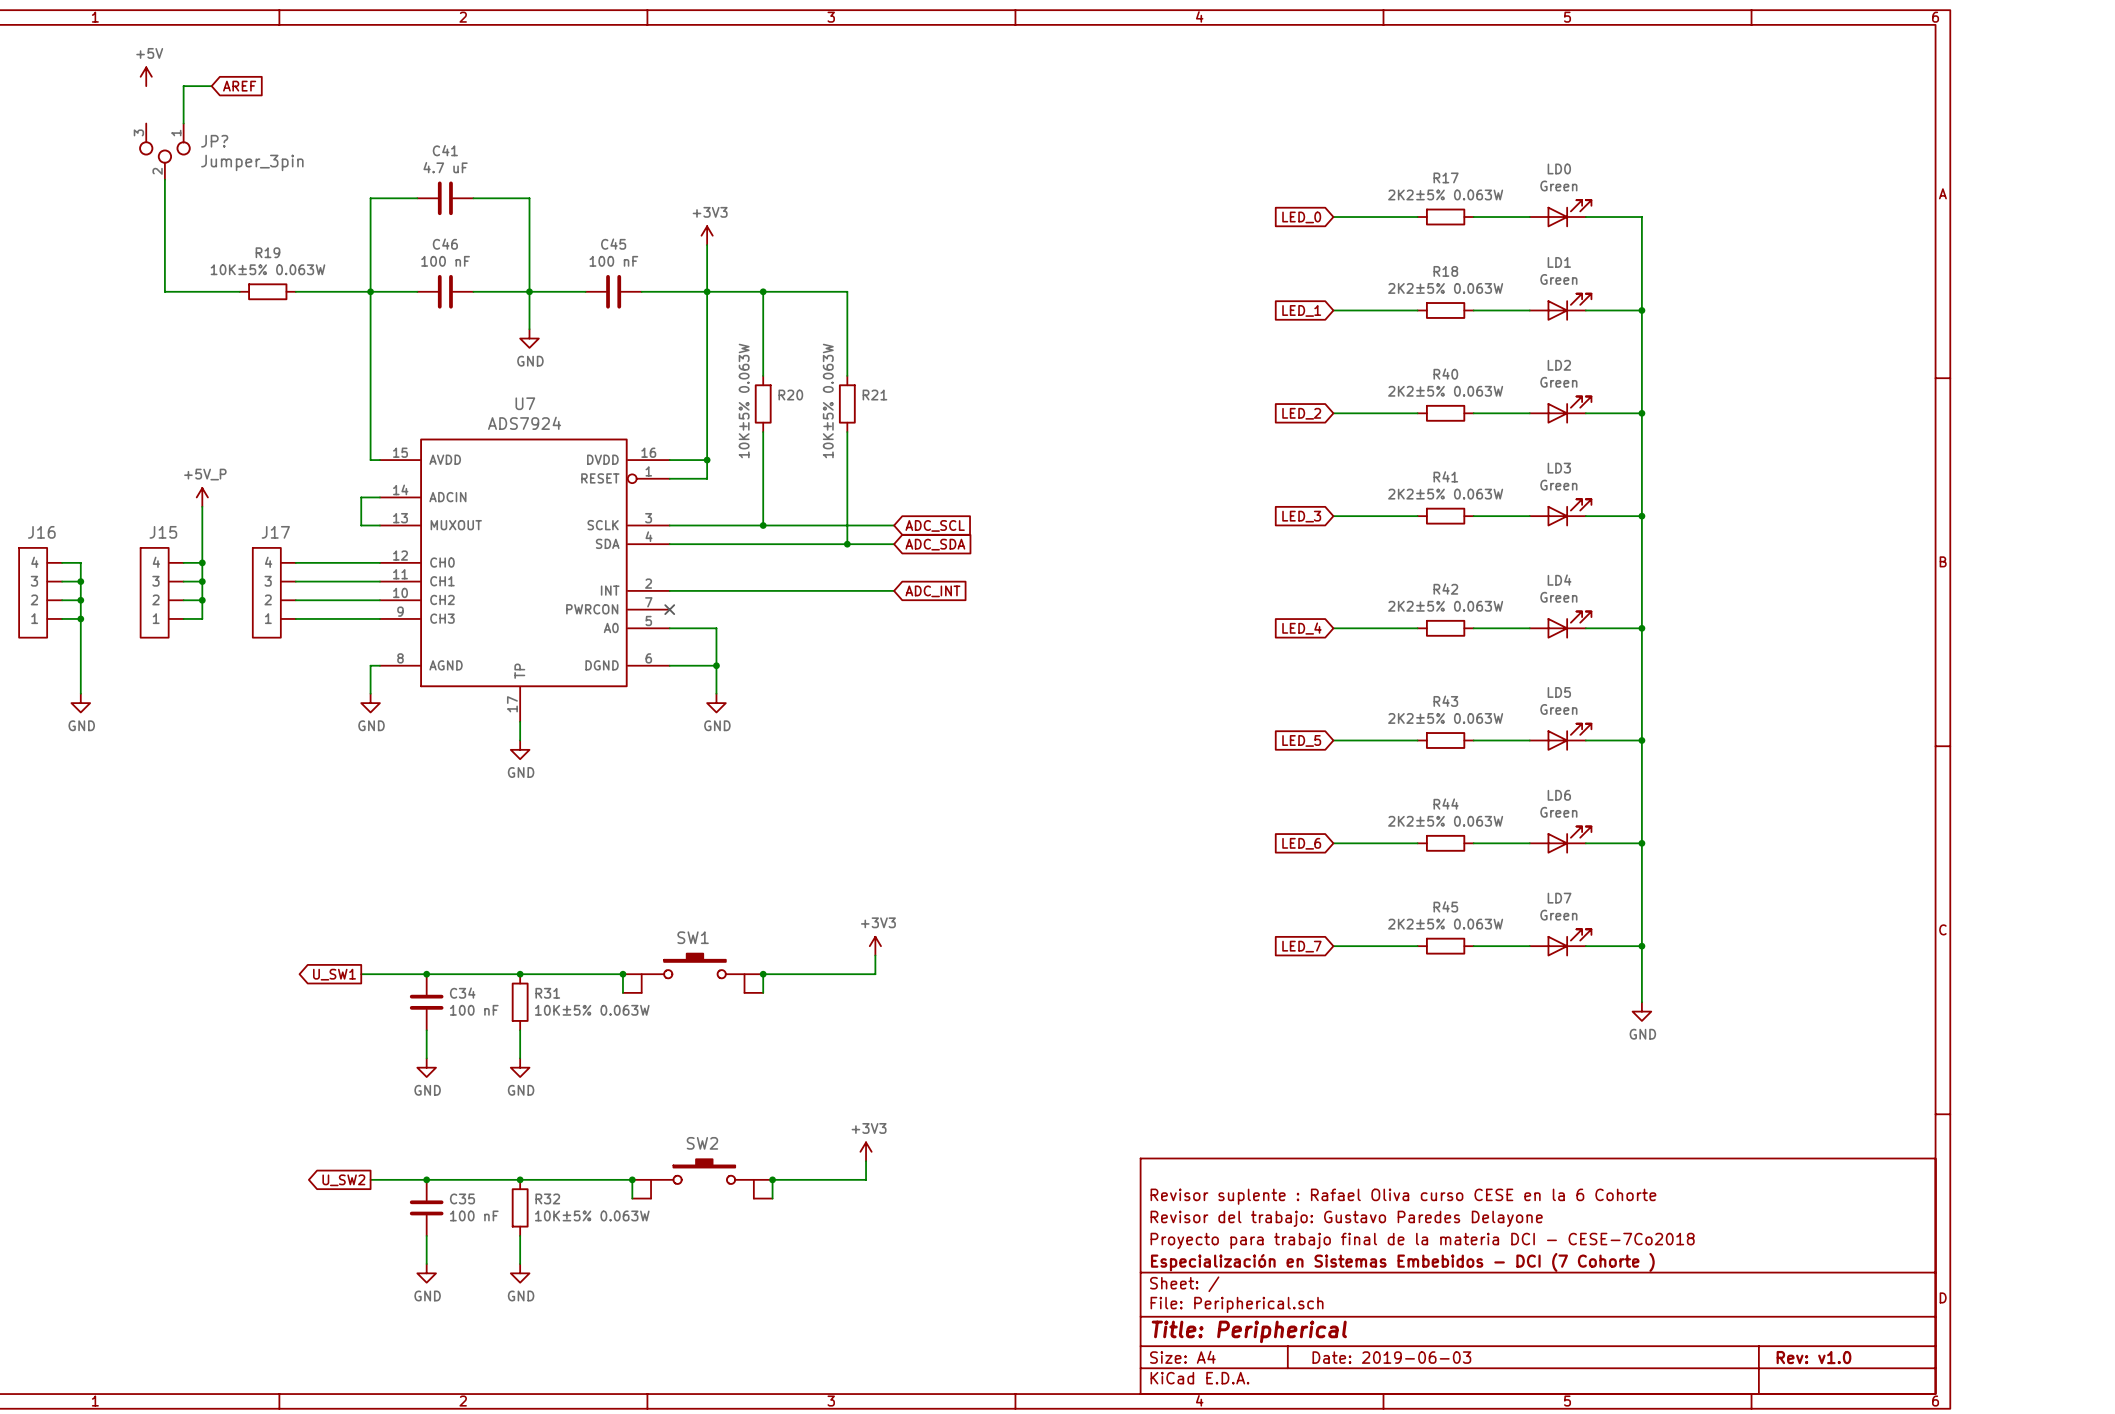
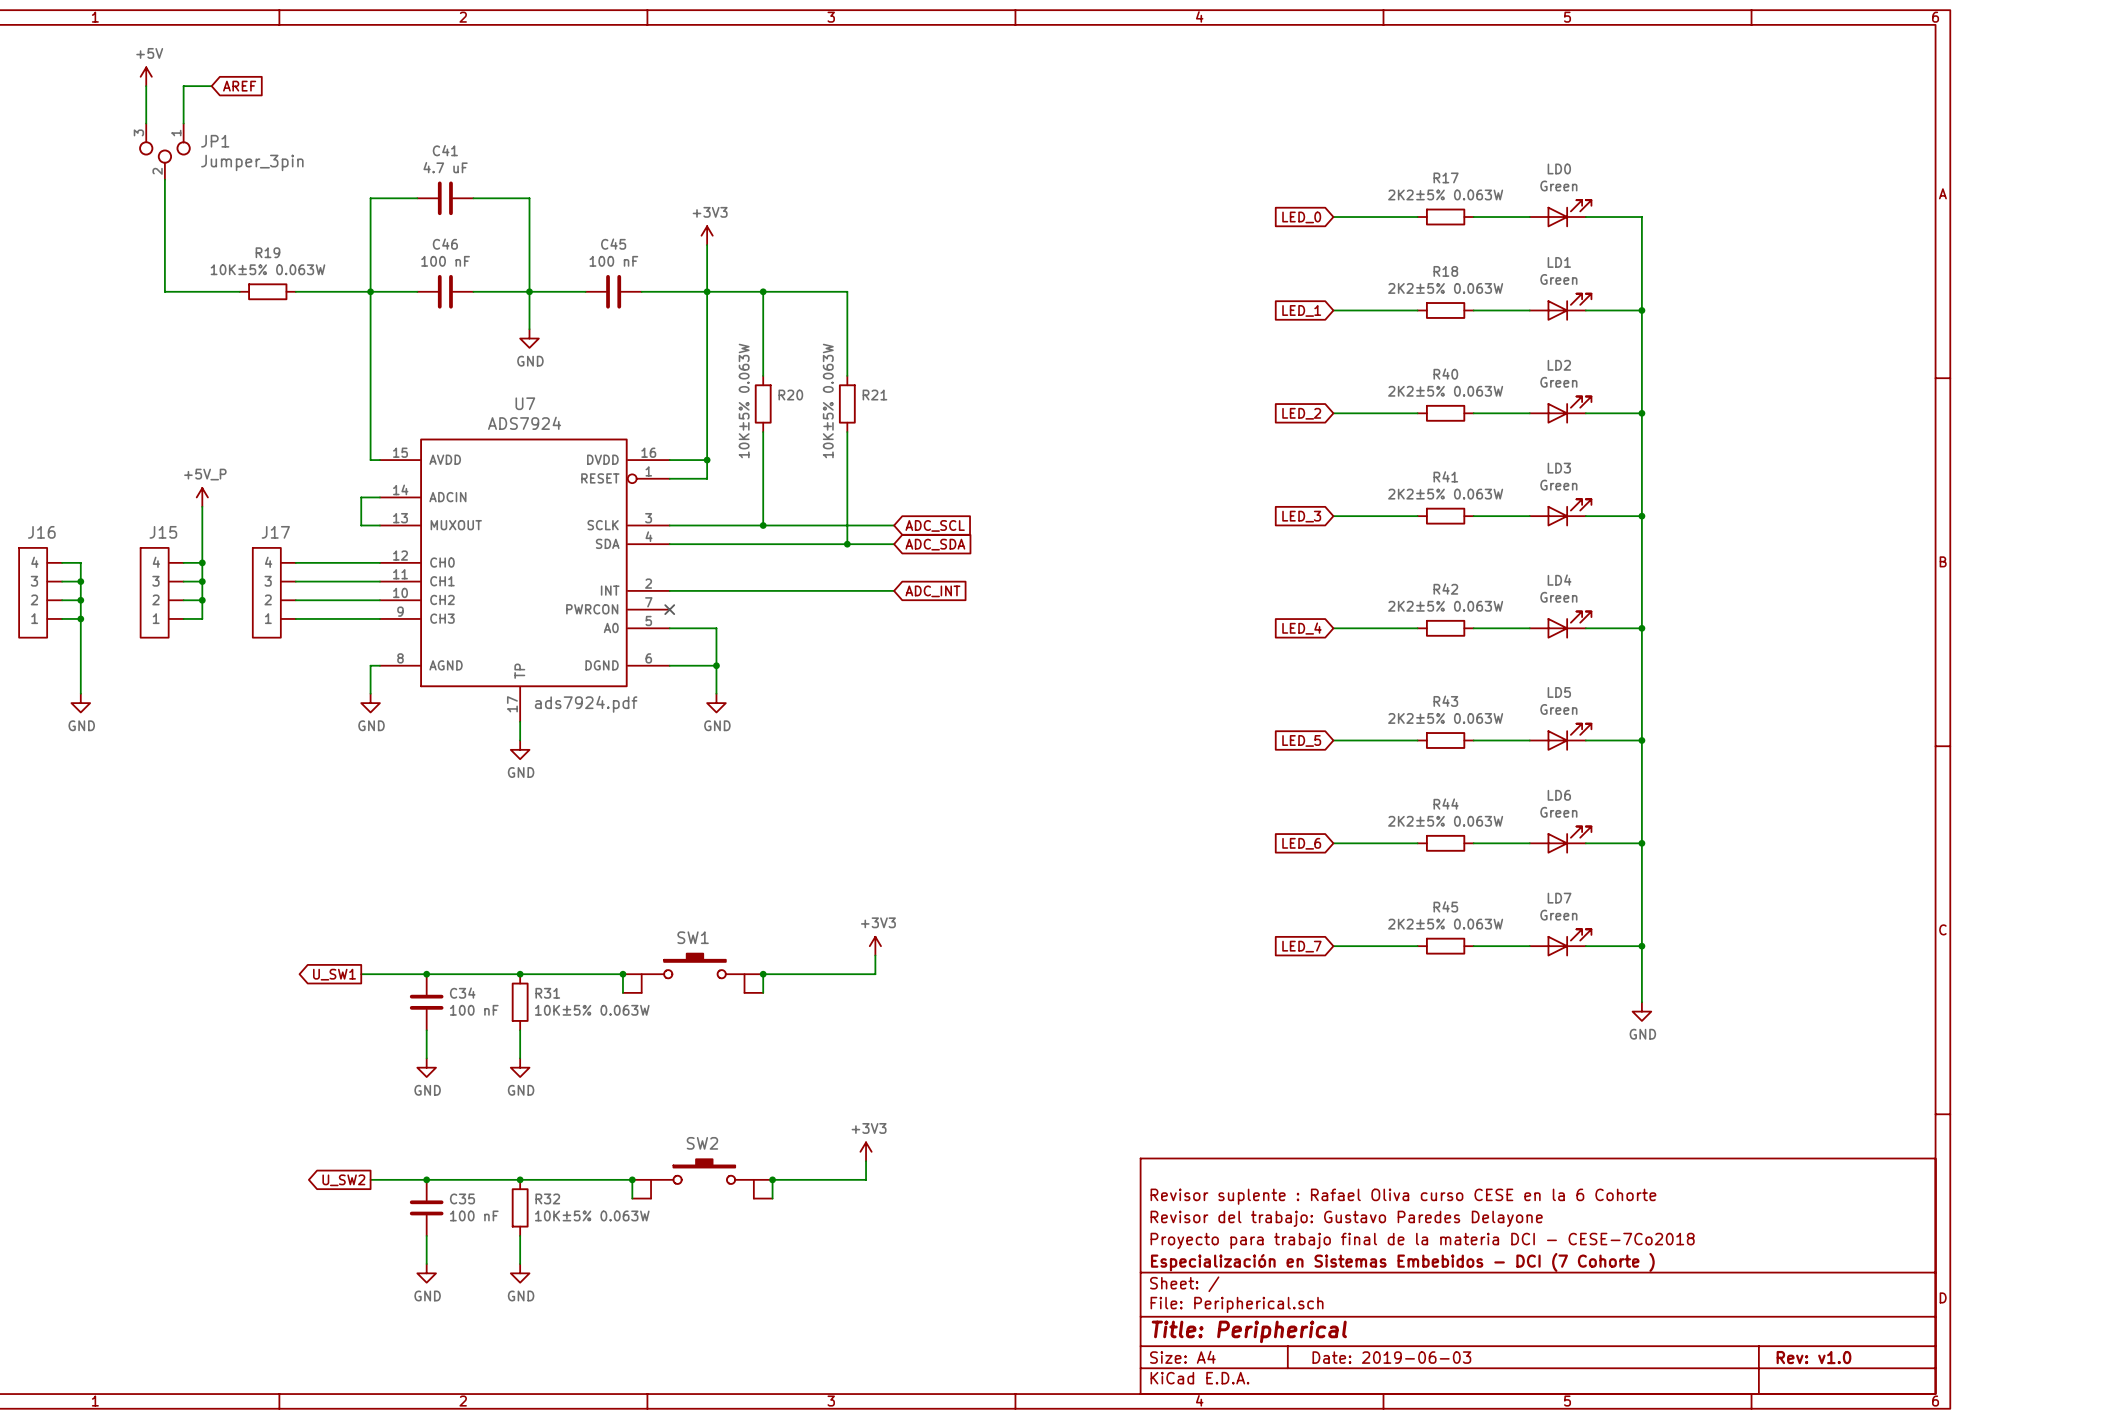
wire: none -> (146, 86) (146, 123)
JP? name: JP? (214, 141) -> JP1 (215, 141)
U7 text: none -> ads7924.pdf (586, 704)

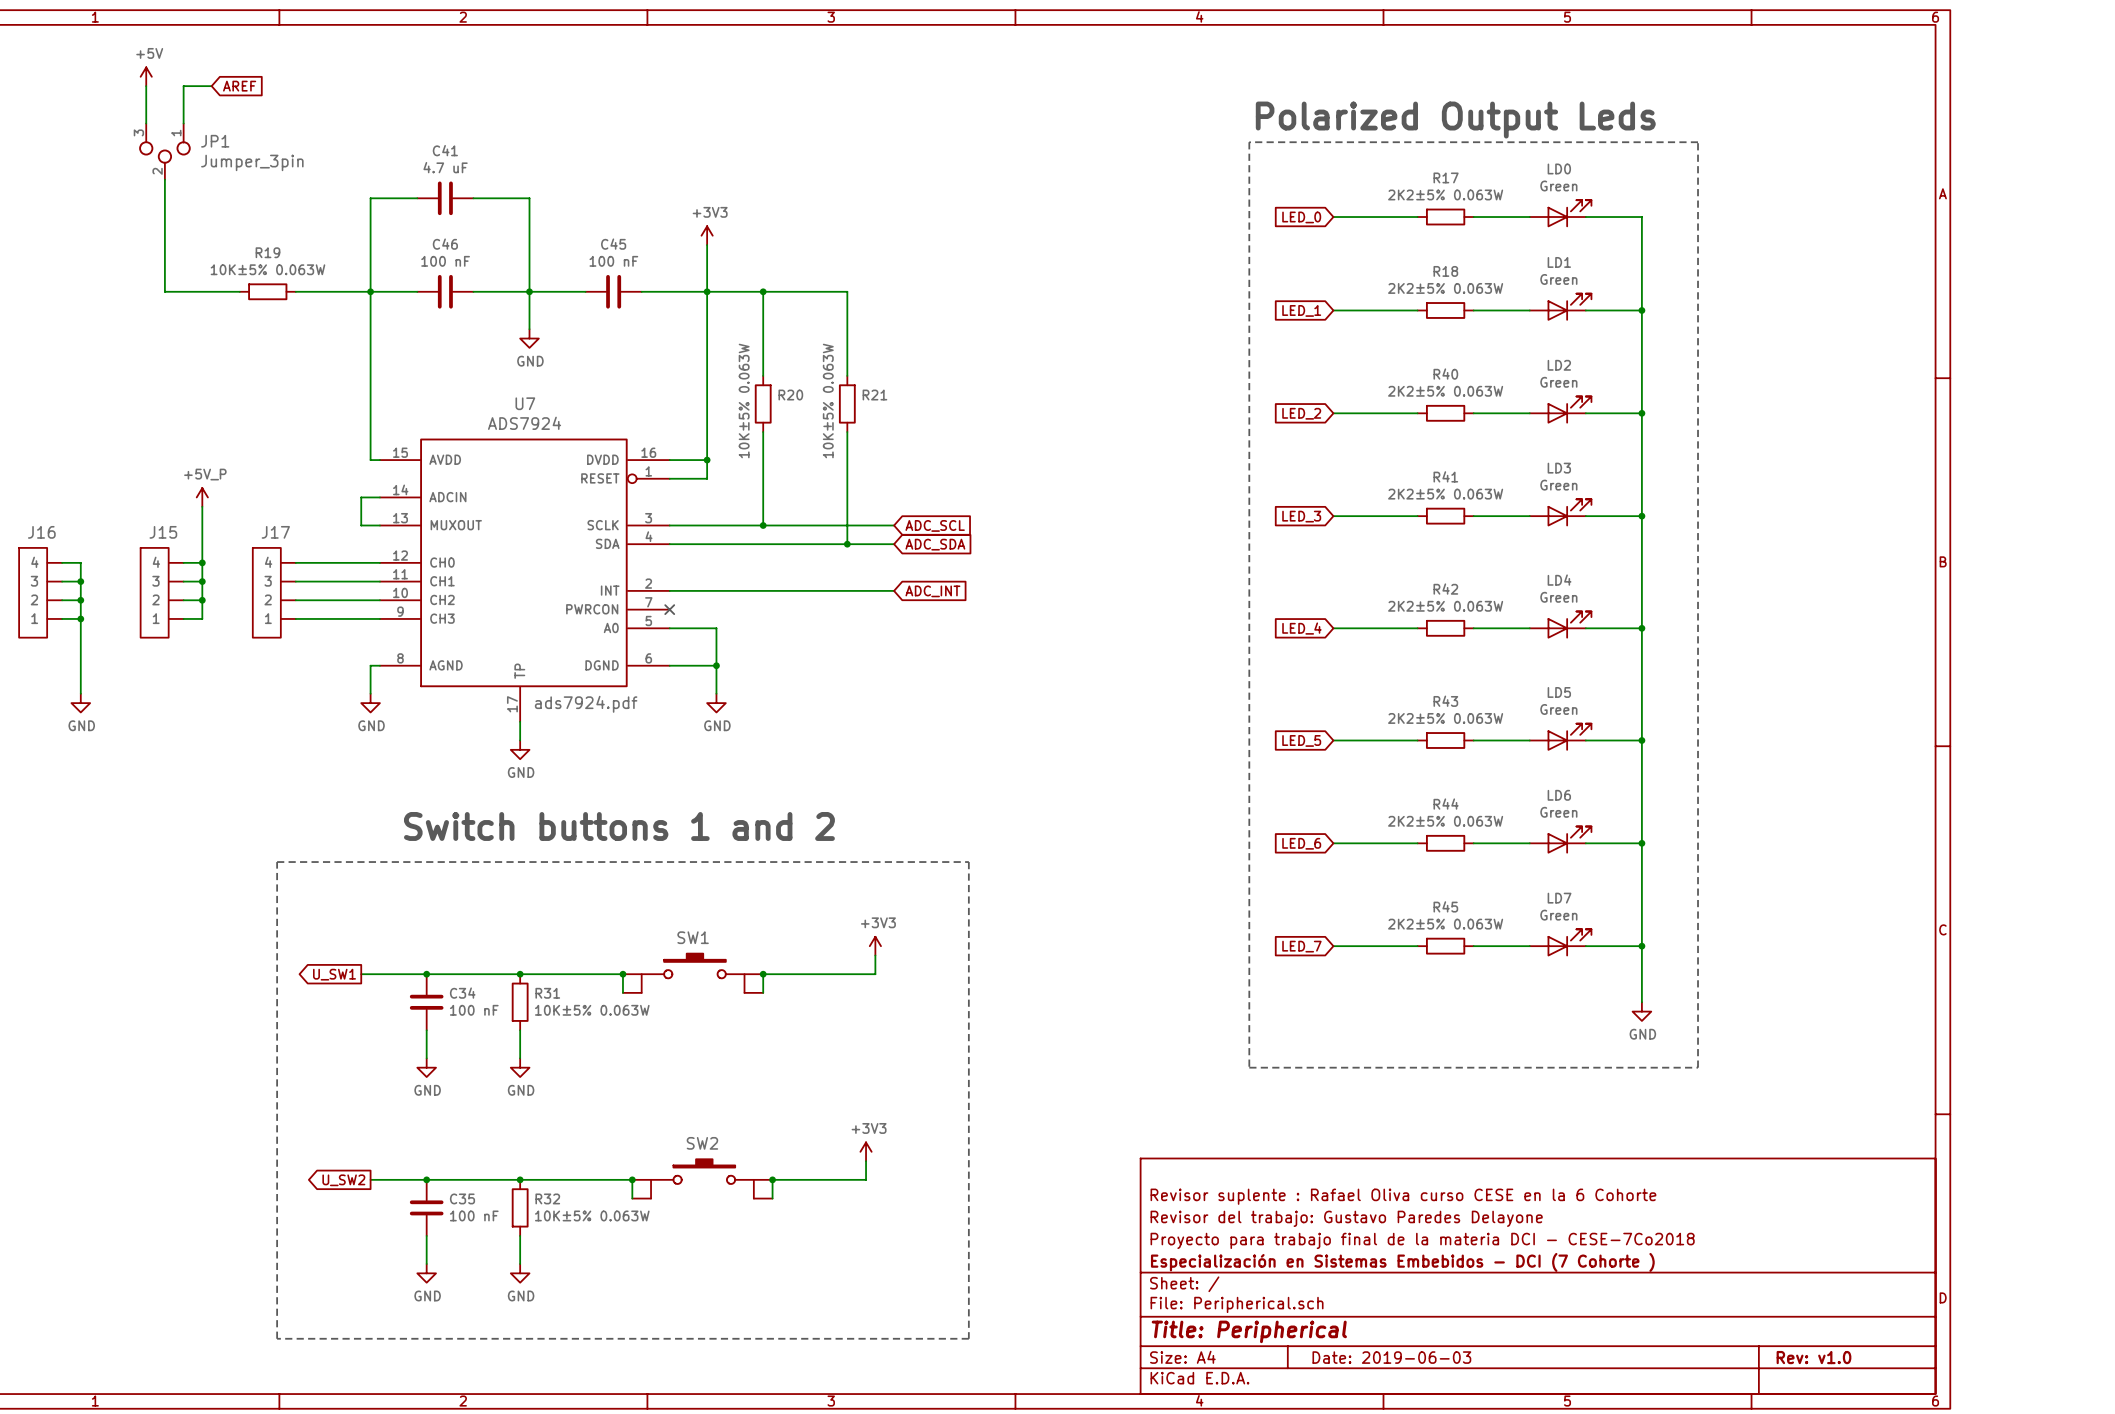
text: none -> Polarized Output Leds (1455, 120)
line: none -> (1249, 142) (1249, 1067) (1698, 1067) (1698, 142) (1249, 142)
text: none -> Switch buttons 1 and 2 (619, 826)
line: none -> (277, 862) (277, 1338) (968, 1338) (968, 862) (277, 862)

